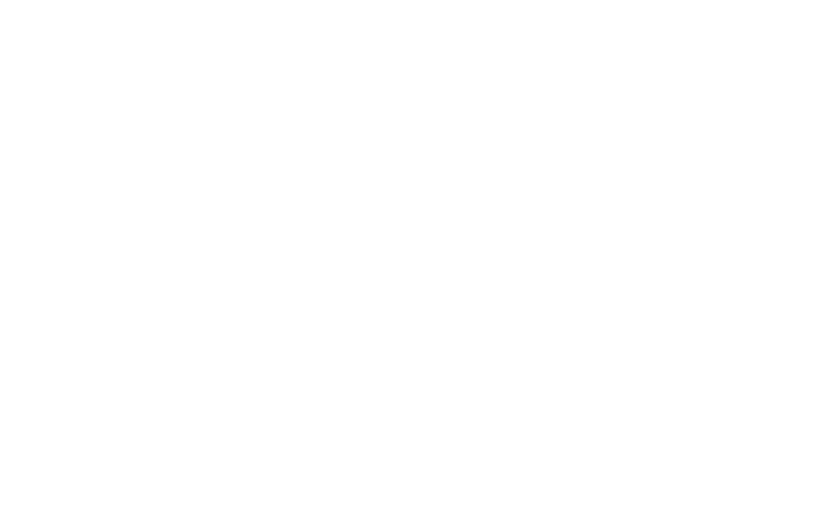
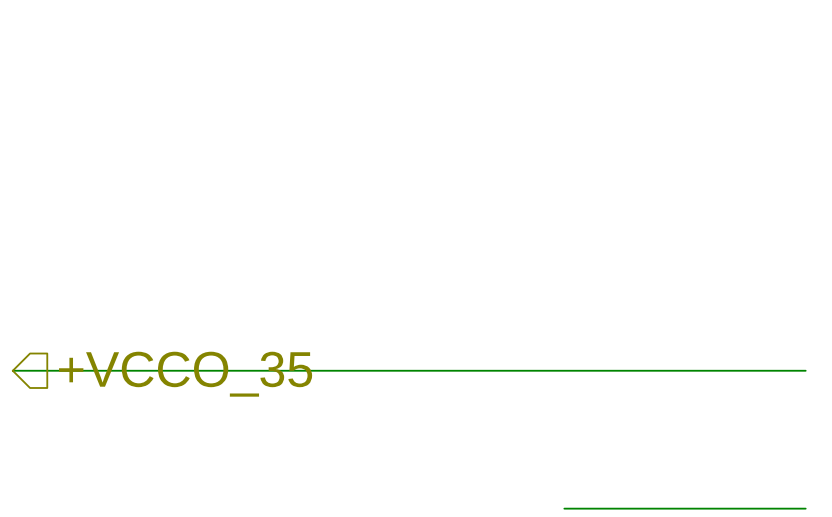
wire: none -> (12, 370) (805, 370)
hierarchical label: none -> +VCCO_35 (185, 374)
wire: none -> (564, 508) (805, 508)

